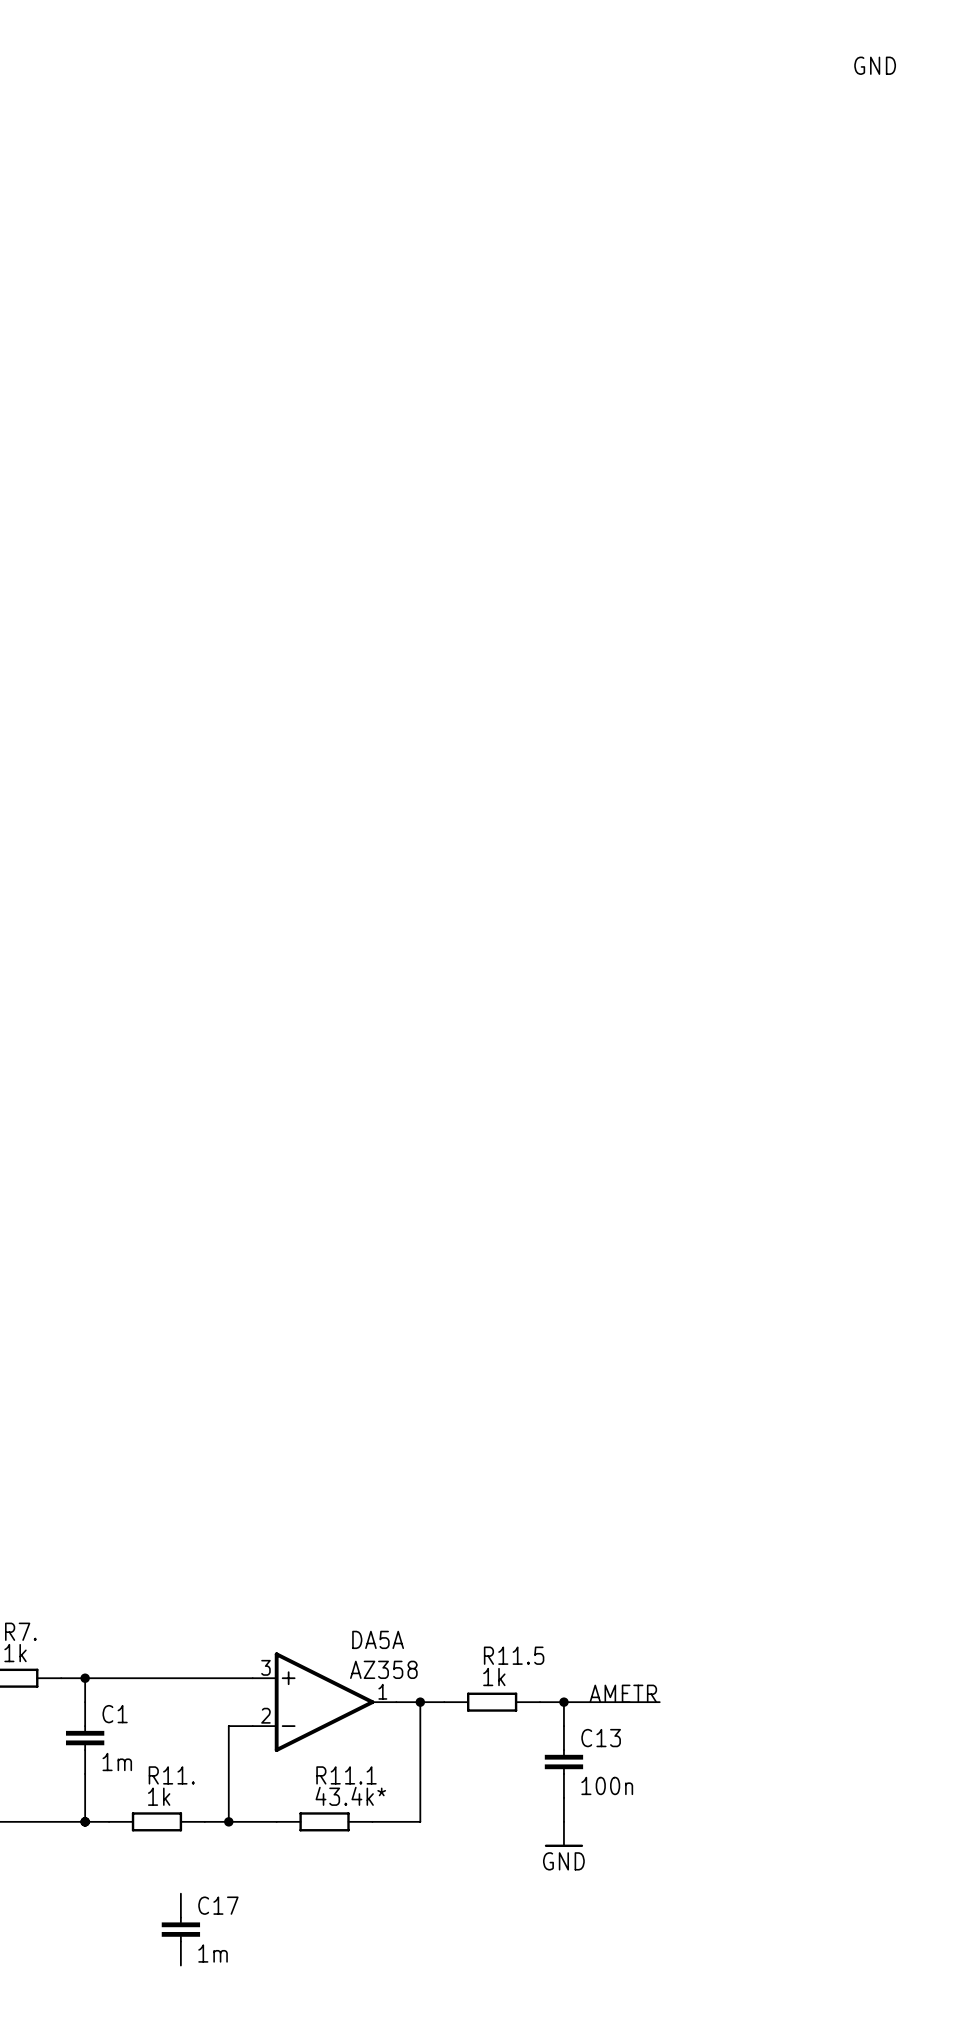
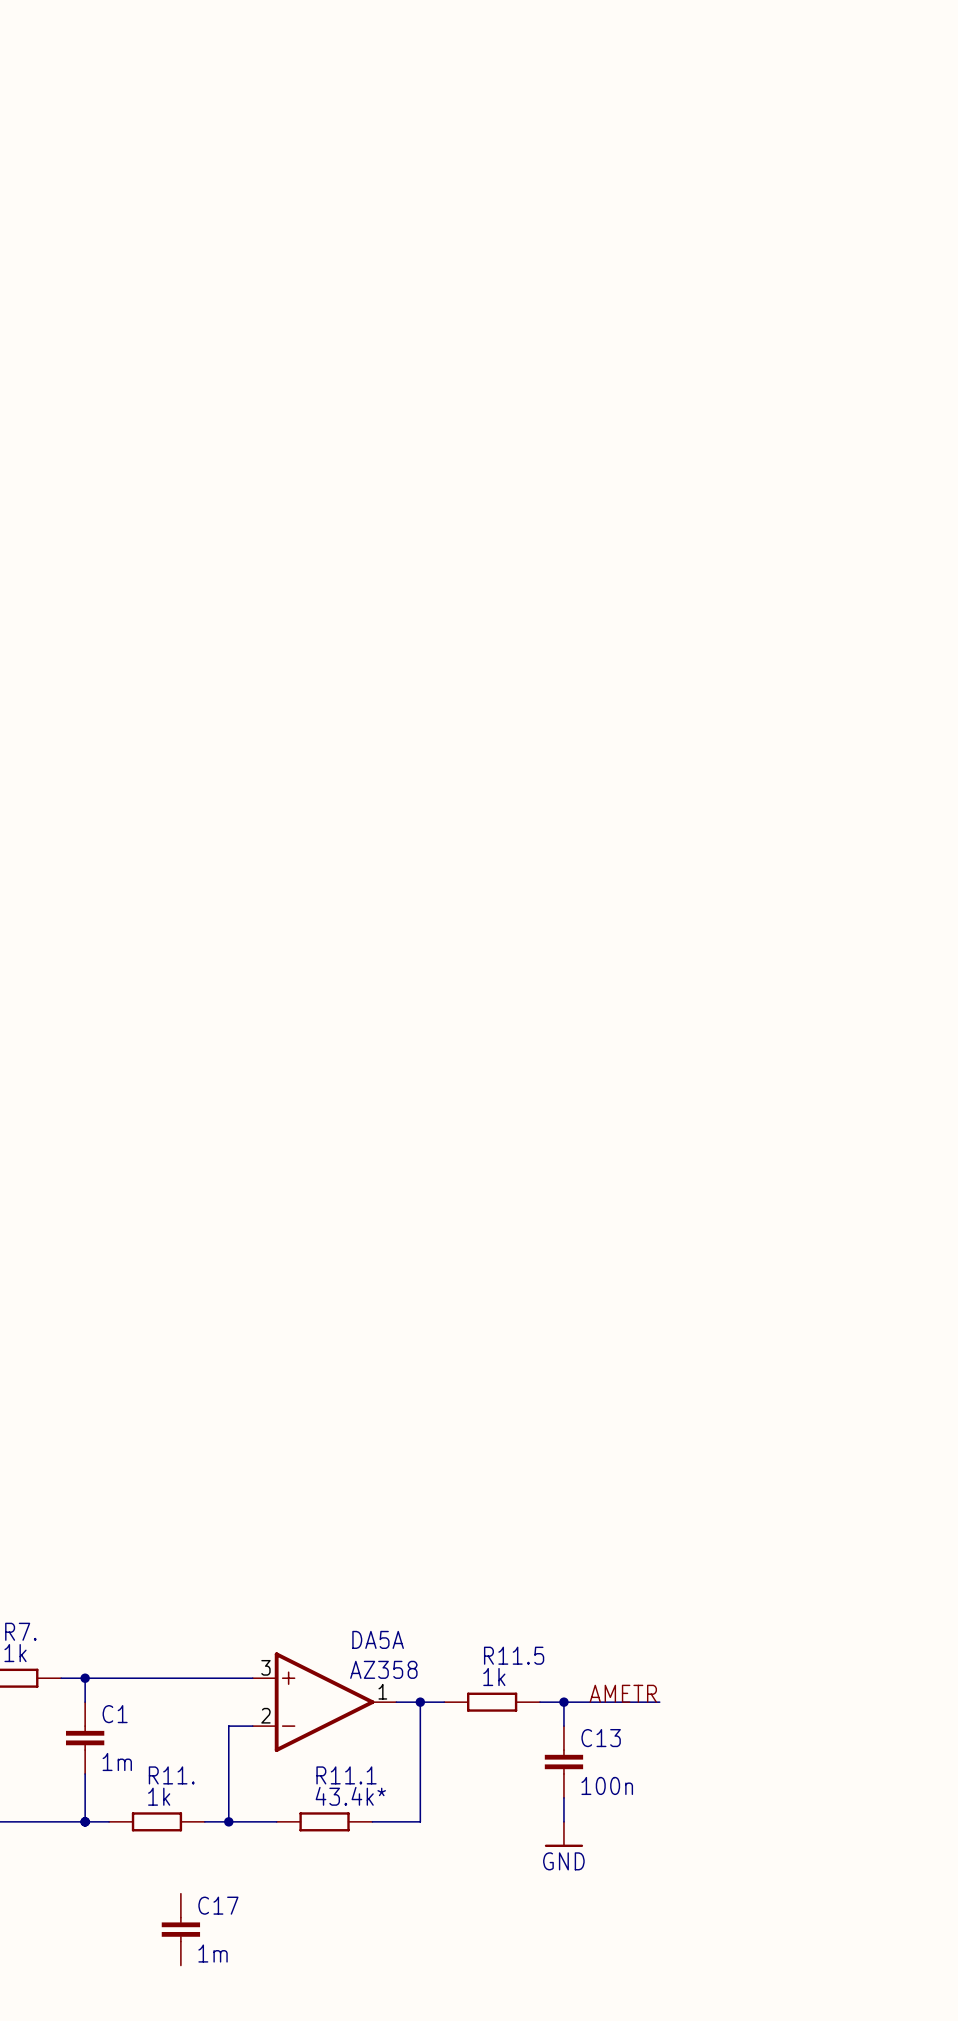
part: (875, 65) -> none

